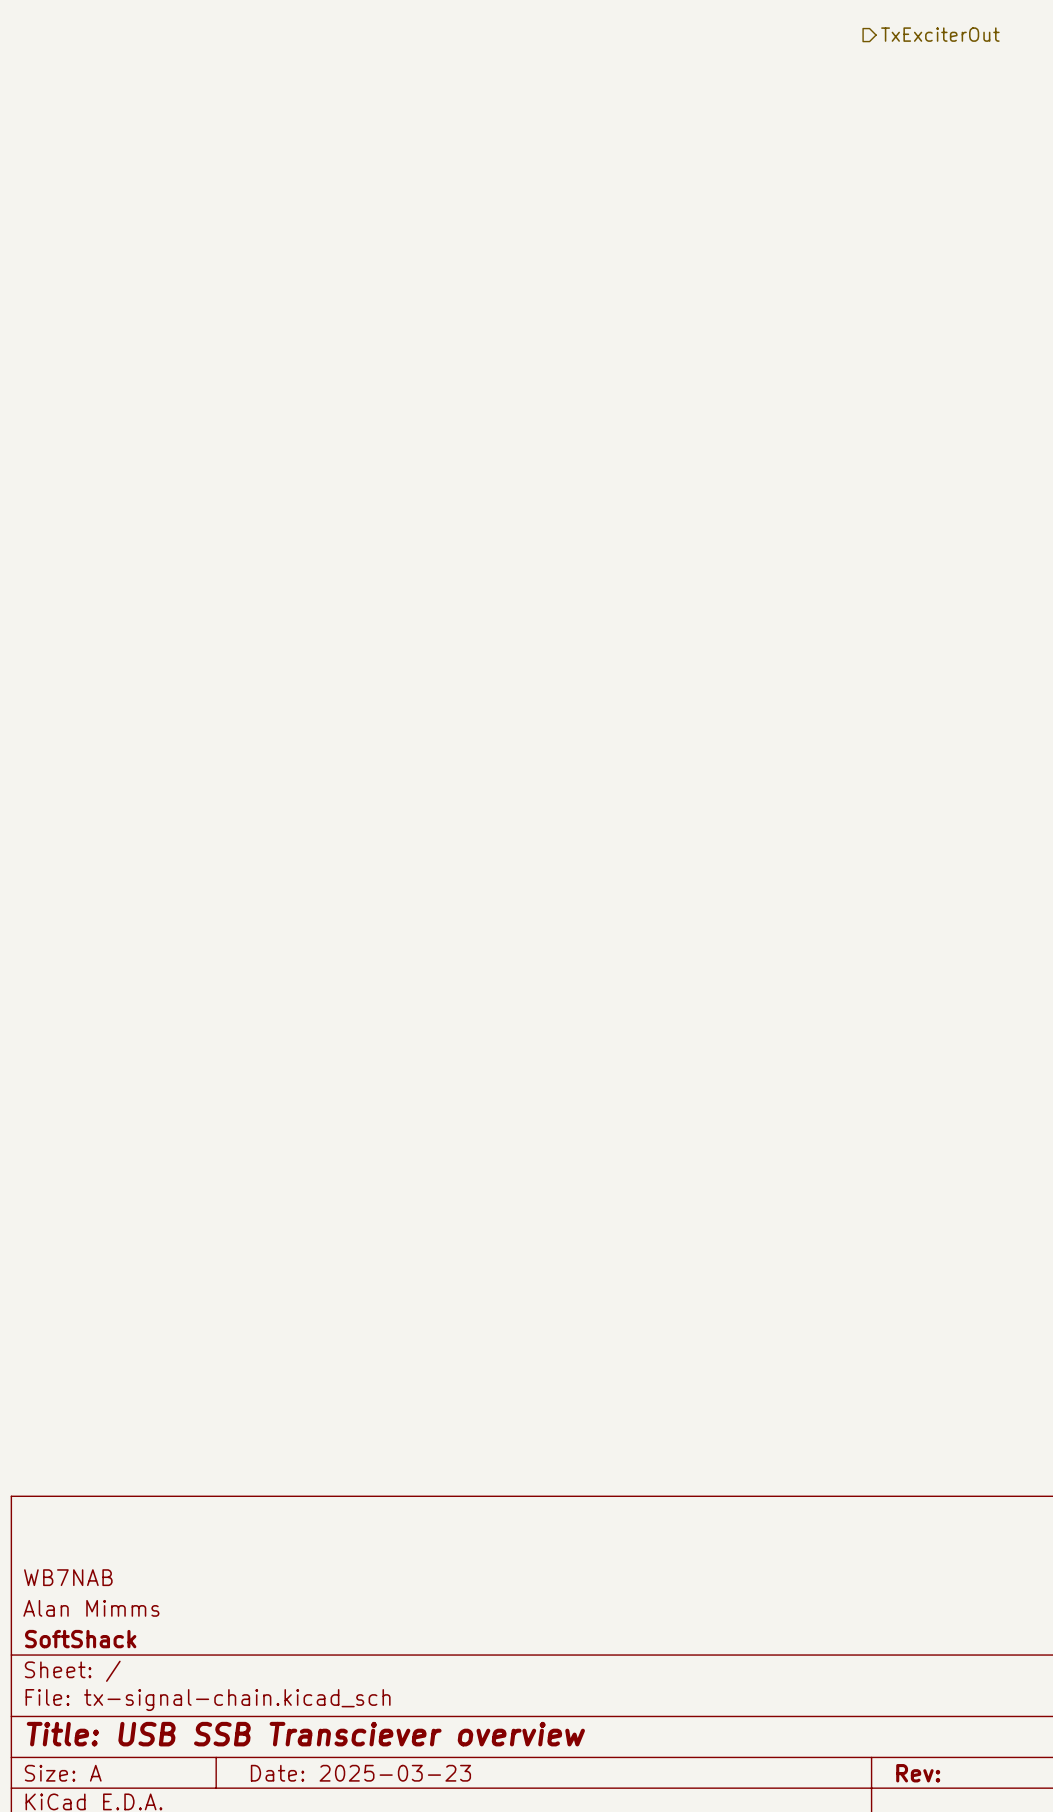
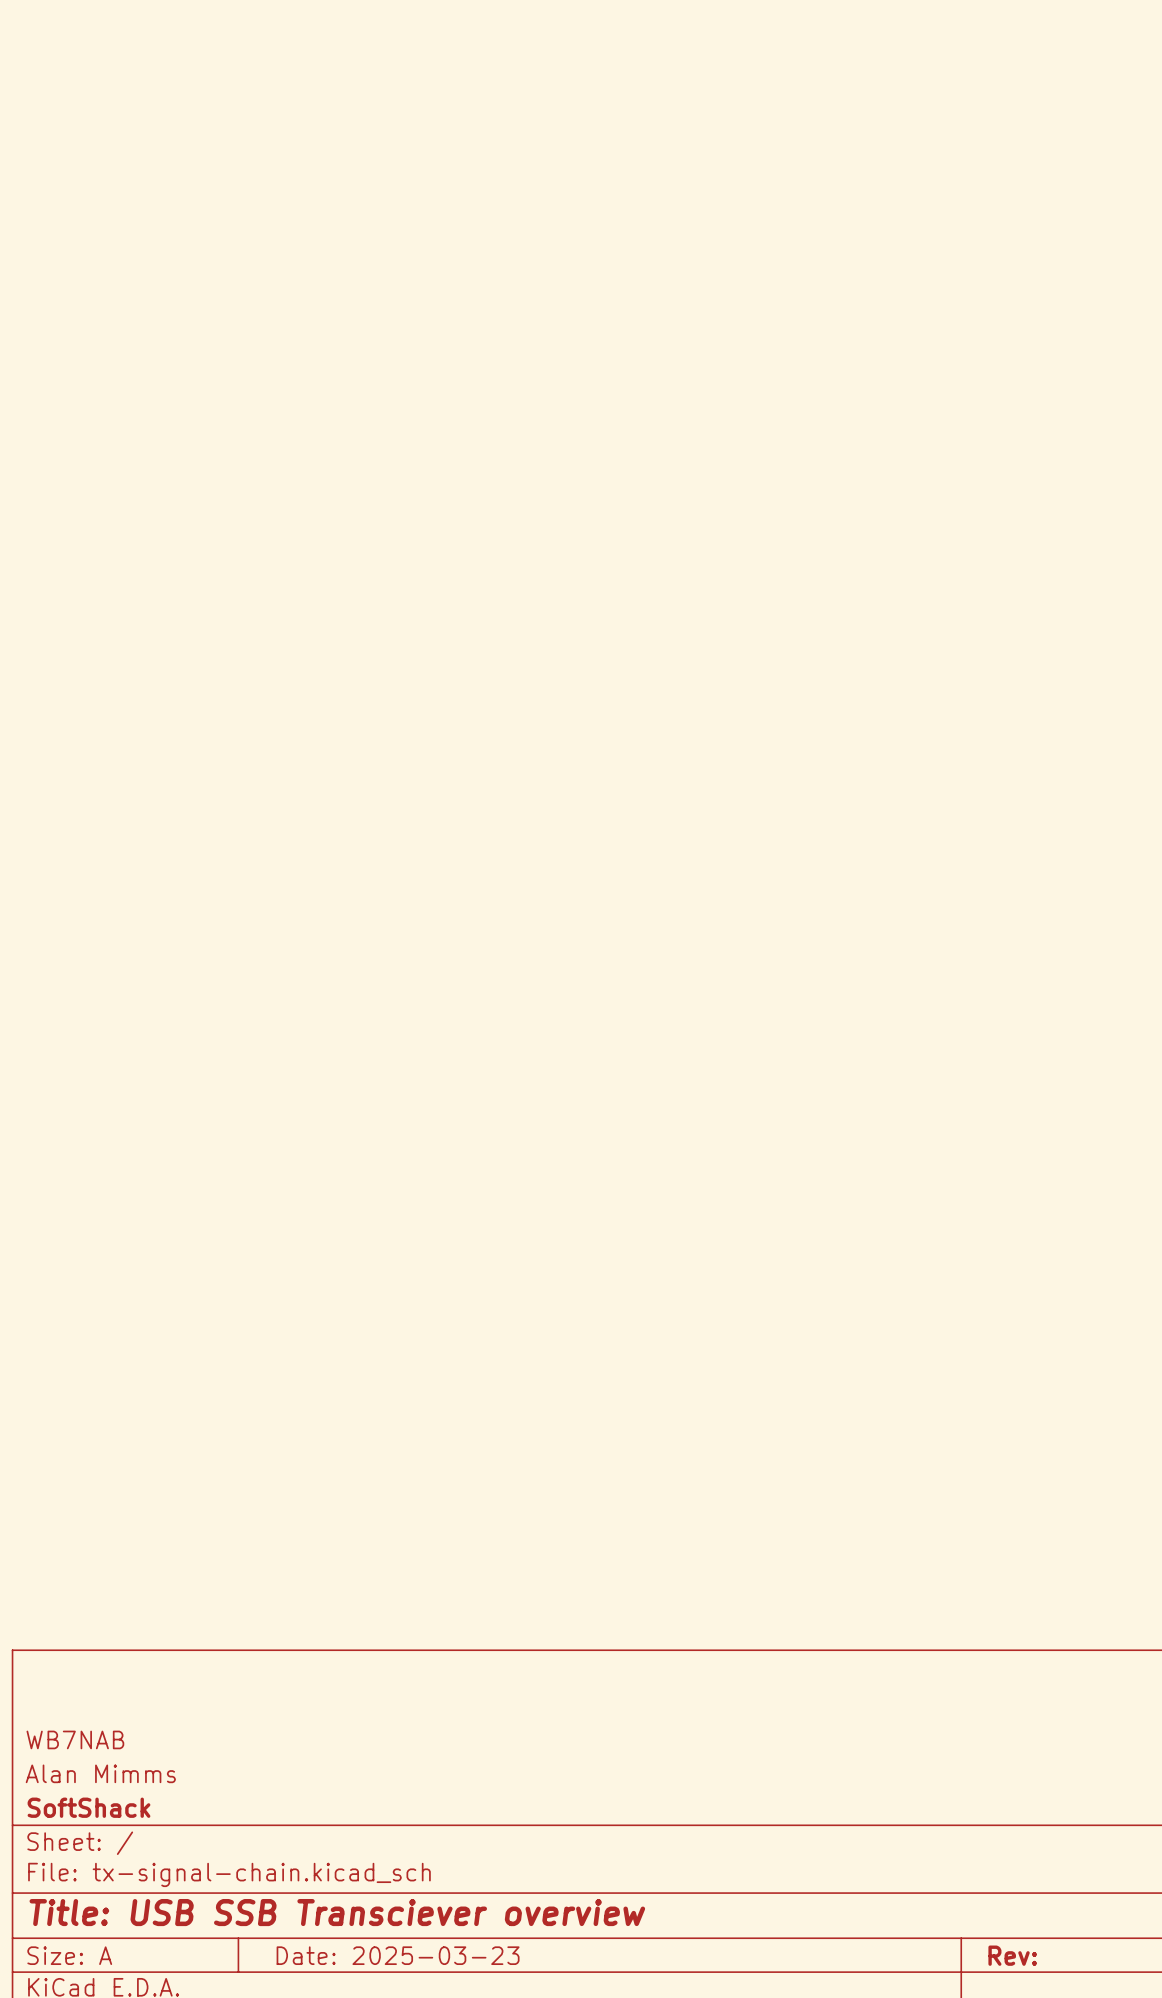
hierarchical label: TxExciterOut (940, 34) -> none

